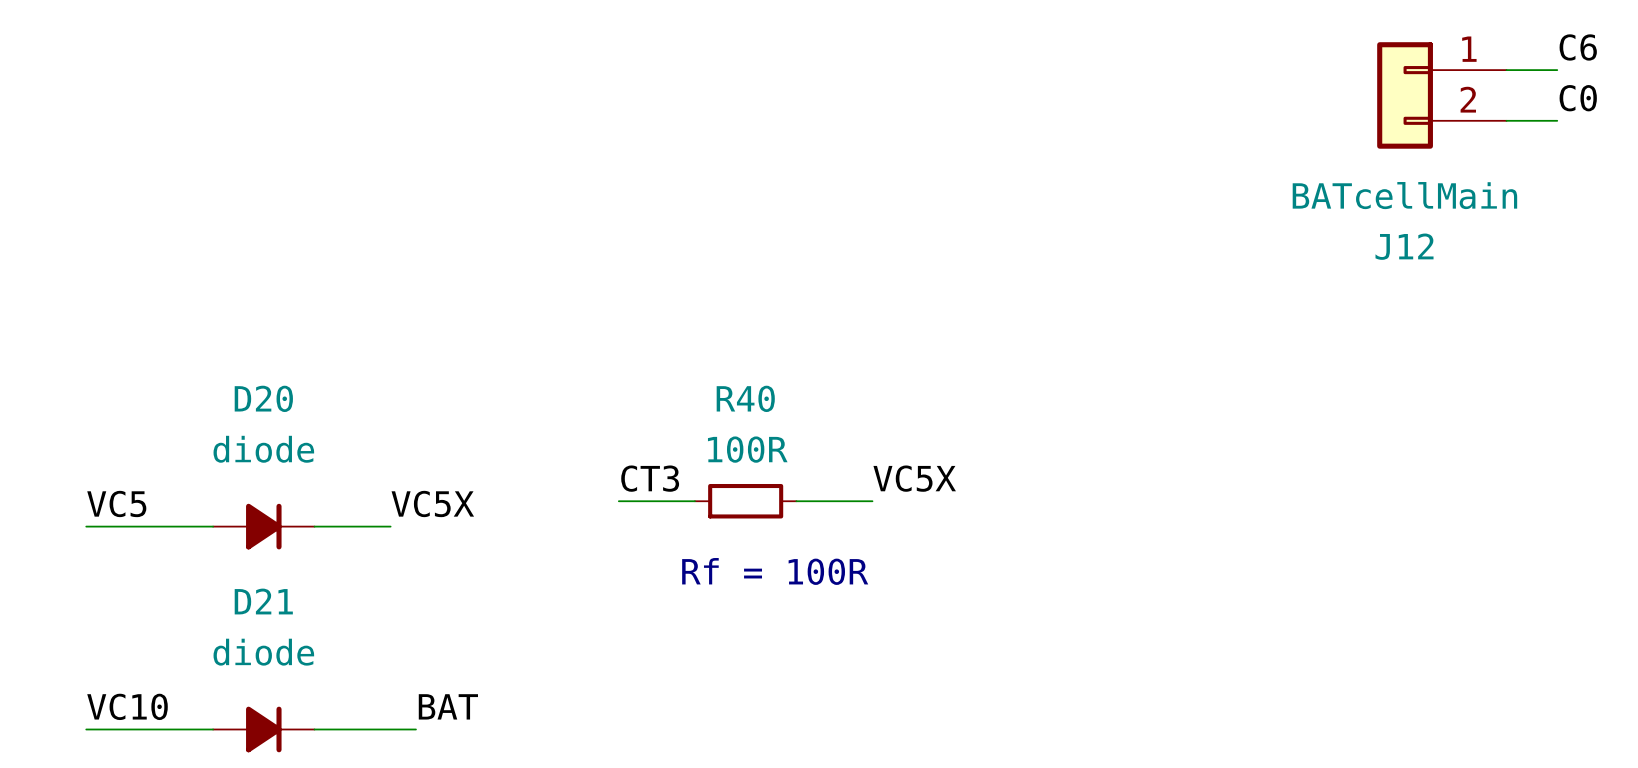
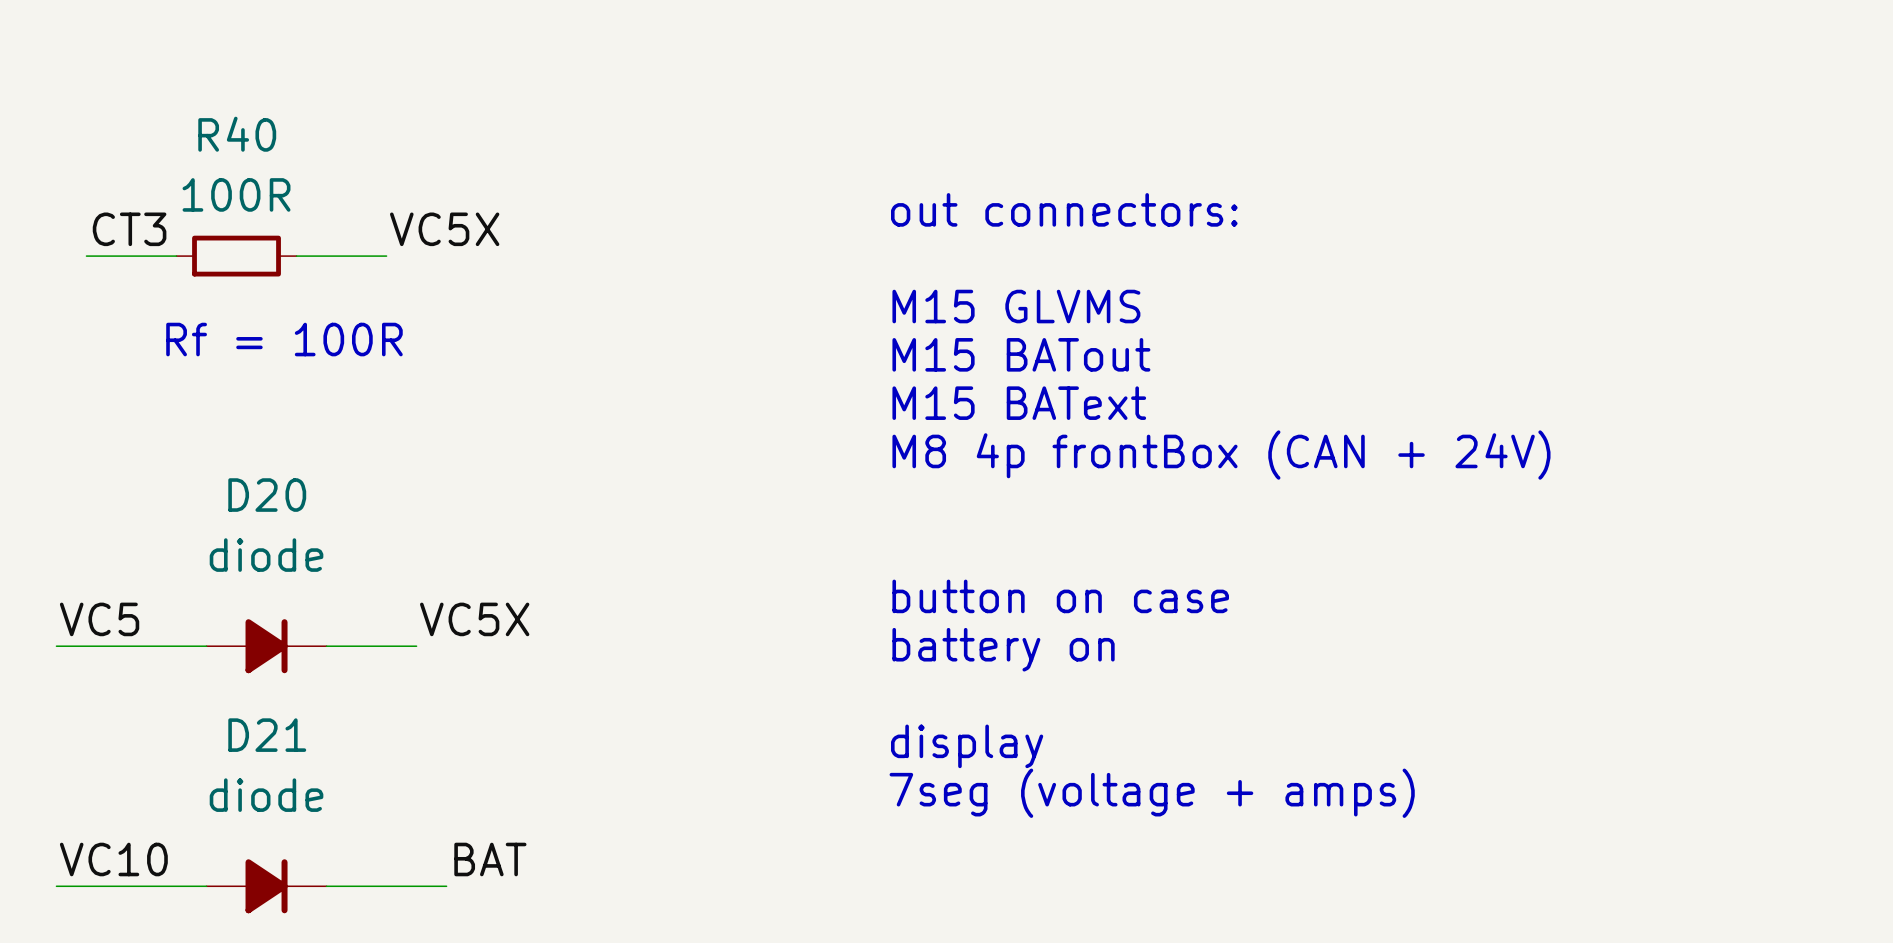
label: C6 (1578, 47) -> none
wire: (1506, 70) (1557, 70) -> none
J12: BATcellMain (1441, 95) -> none
label: C0 (1578, 98) -> none
wire: (1506, 120) (1557, 120) -> none
text: none -> out connectors: (1064, 209)
label: none -> CT3 (129, 229)
label: none -> VC5X (444, 229)
wire: none -> (86, 256) (176, 256)
text: none -> M15 GLVMS (1016, 306)
text: none -> Rf = 100R (284, 339)
text: none -> M15 BATout (1021, 354)
text: none -> M15 BAText (1019, 403)
text: none -> M8 4p frontBox (CAN + 24V) (1221, 455)
label: CT3 (650, 478) -> none
label: VC5X (914, 478) -> none
text: none -> button on case (1060, 596)
wire: (618, 501) (694, 501) -> (296, 256) (386, 256)
R40 position: (745, 501) -> (236, 256)
wire: (796, 501) (872, 501) -> none
text: none -> battery on (1003, 649)
text: Rf = 100R (775, 571) -> none
text: none -> display (967, 746)
text: none -> 7seg (voltage + amps) (1152, 793)

